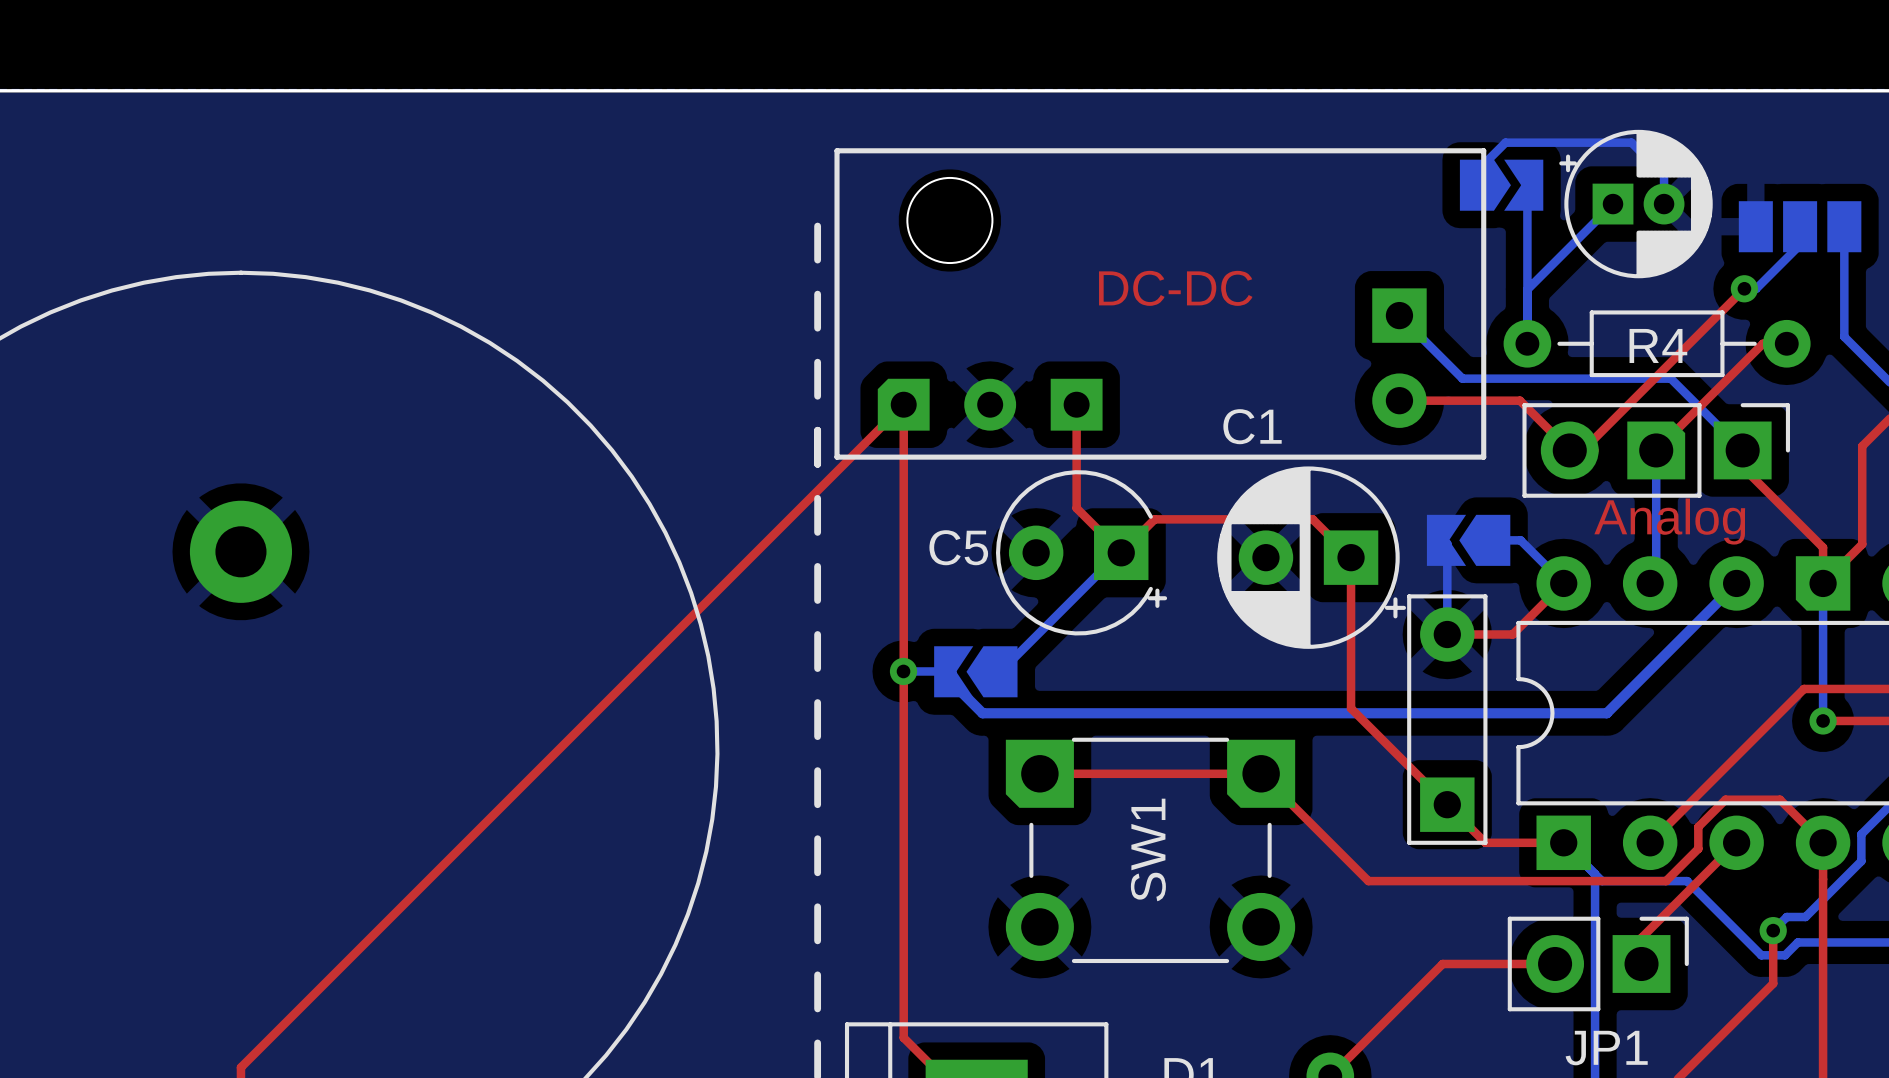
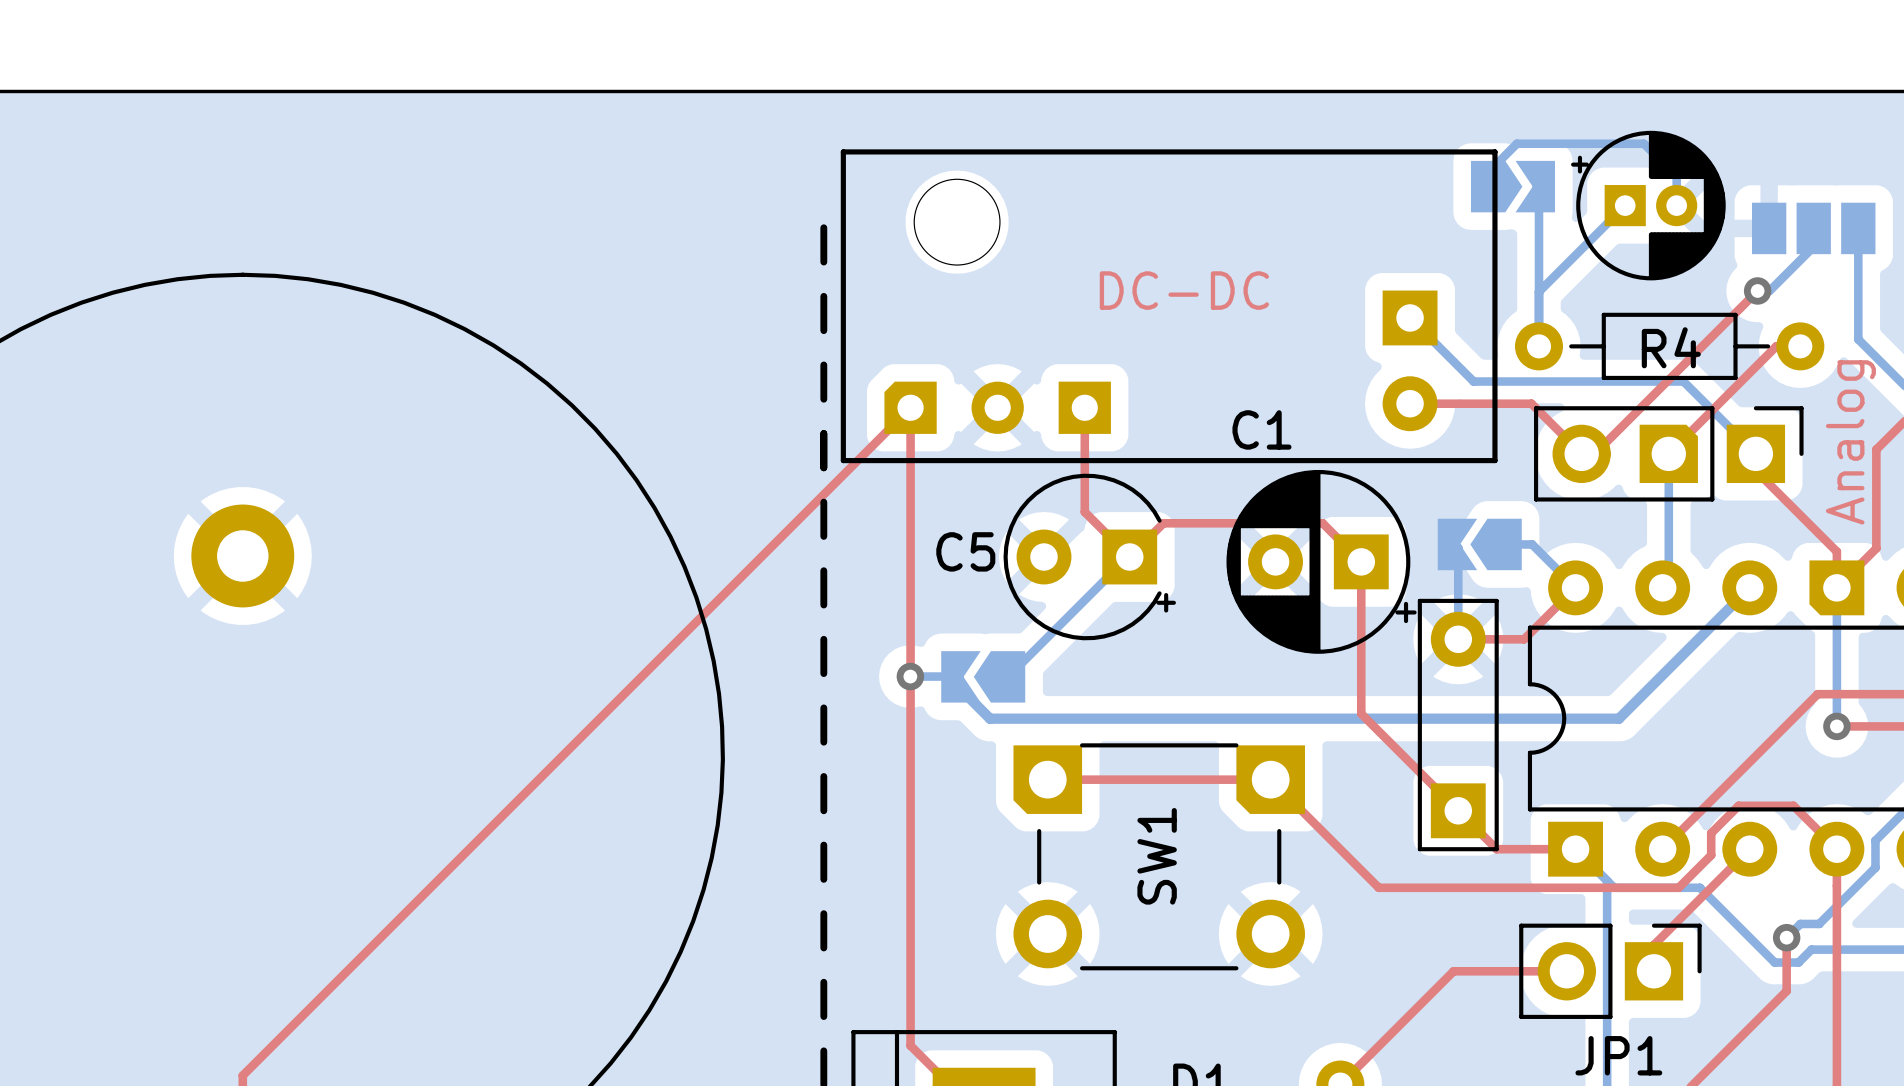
text rotation: 0° (1669, 521) -> 90° counterclockwise (1850, 442)

